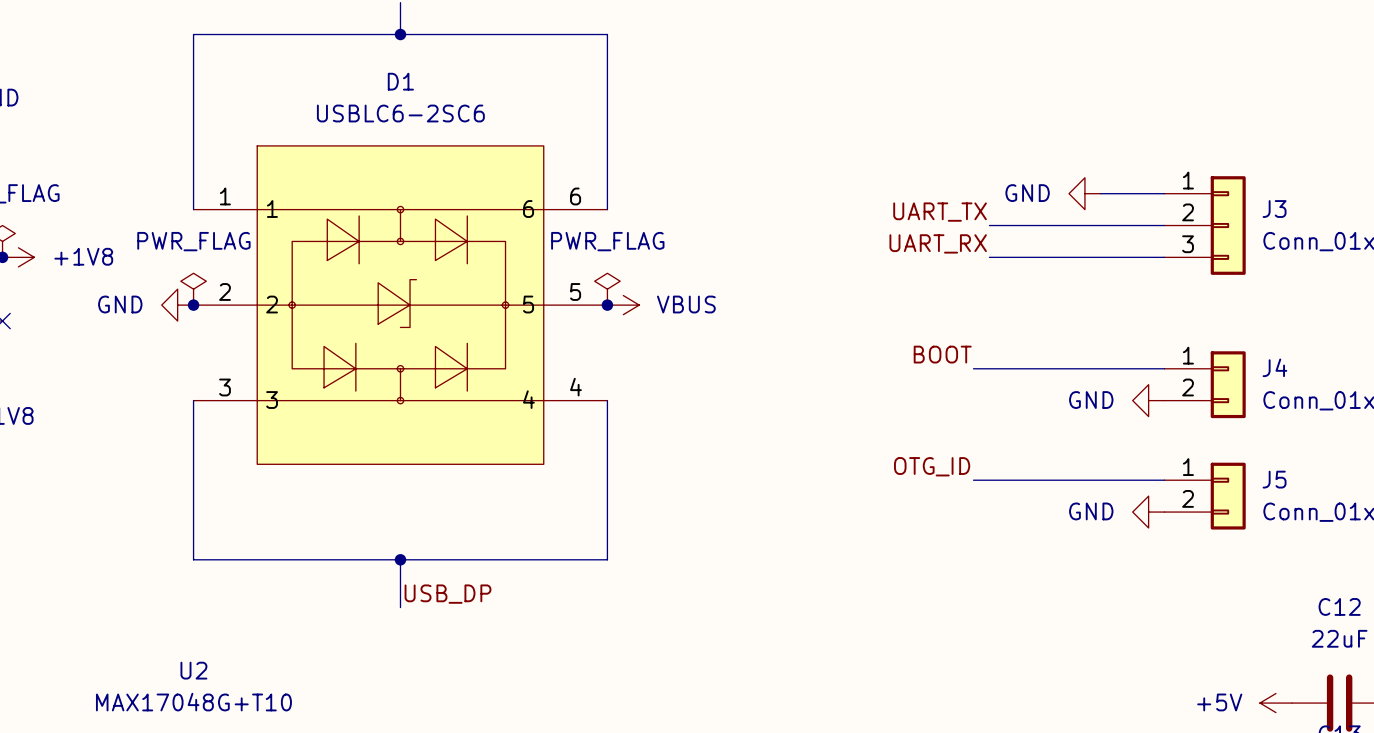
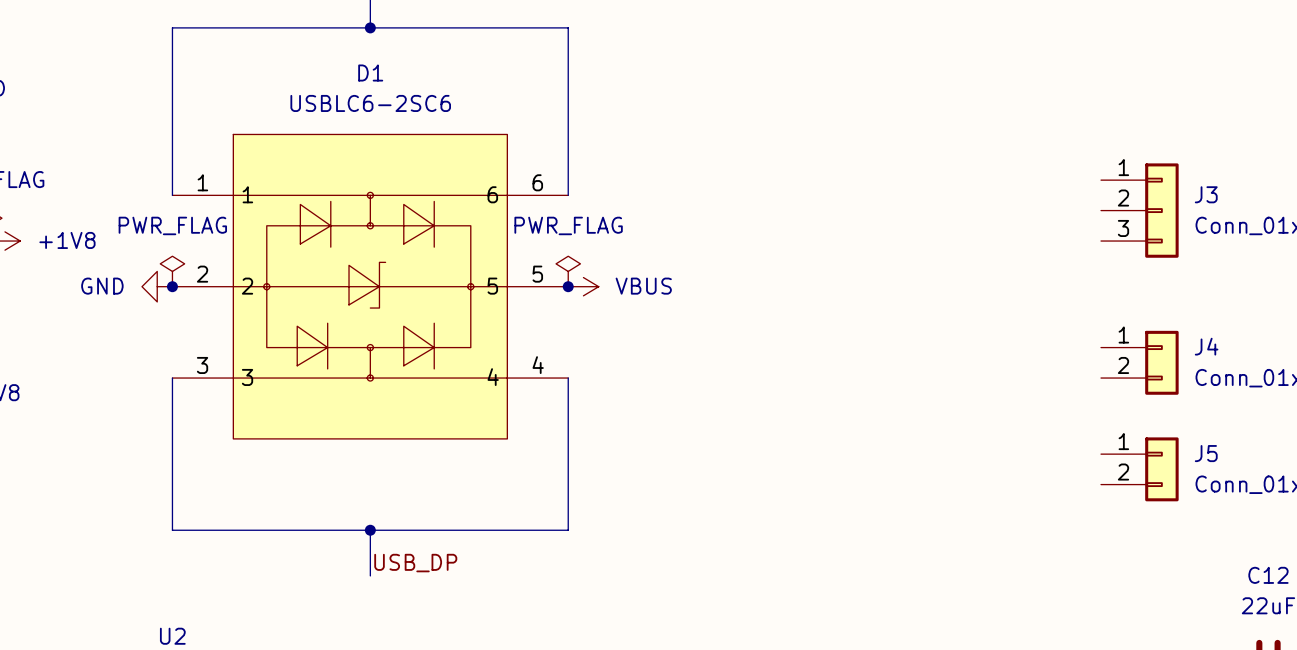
power symbol: GND (1084, 193) -> none
wire: (1100, 193) (1164, 193) -> none
label: UART_TX (940, 212) -> none
wire: (989, 225) (1164, 225) -> none
label: UART_RX (938, 243) -> none
wire: (989, 257) (1164, 257) -> none
label: BOOT (942, 354) -> none
wire: (973, 368) (1164, 368) -> none
power symbol: GND (1148, 400) -> none
label: OTG_ID (932, 466) -> none
wire: (973, 480) (1164, 480) -> none
power symbol: GND (1148, 512) -> none

